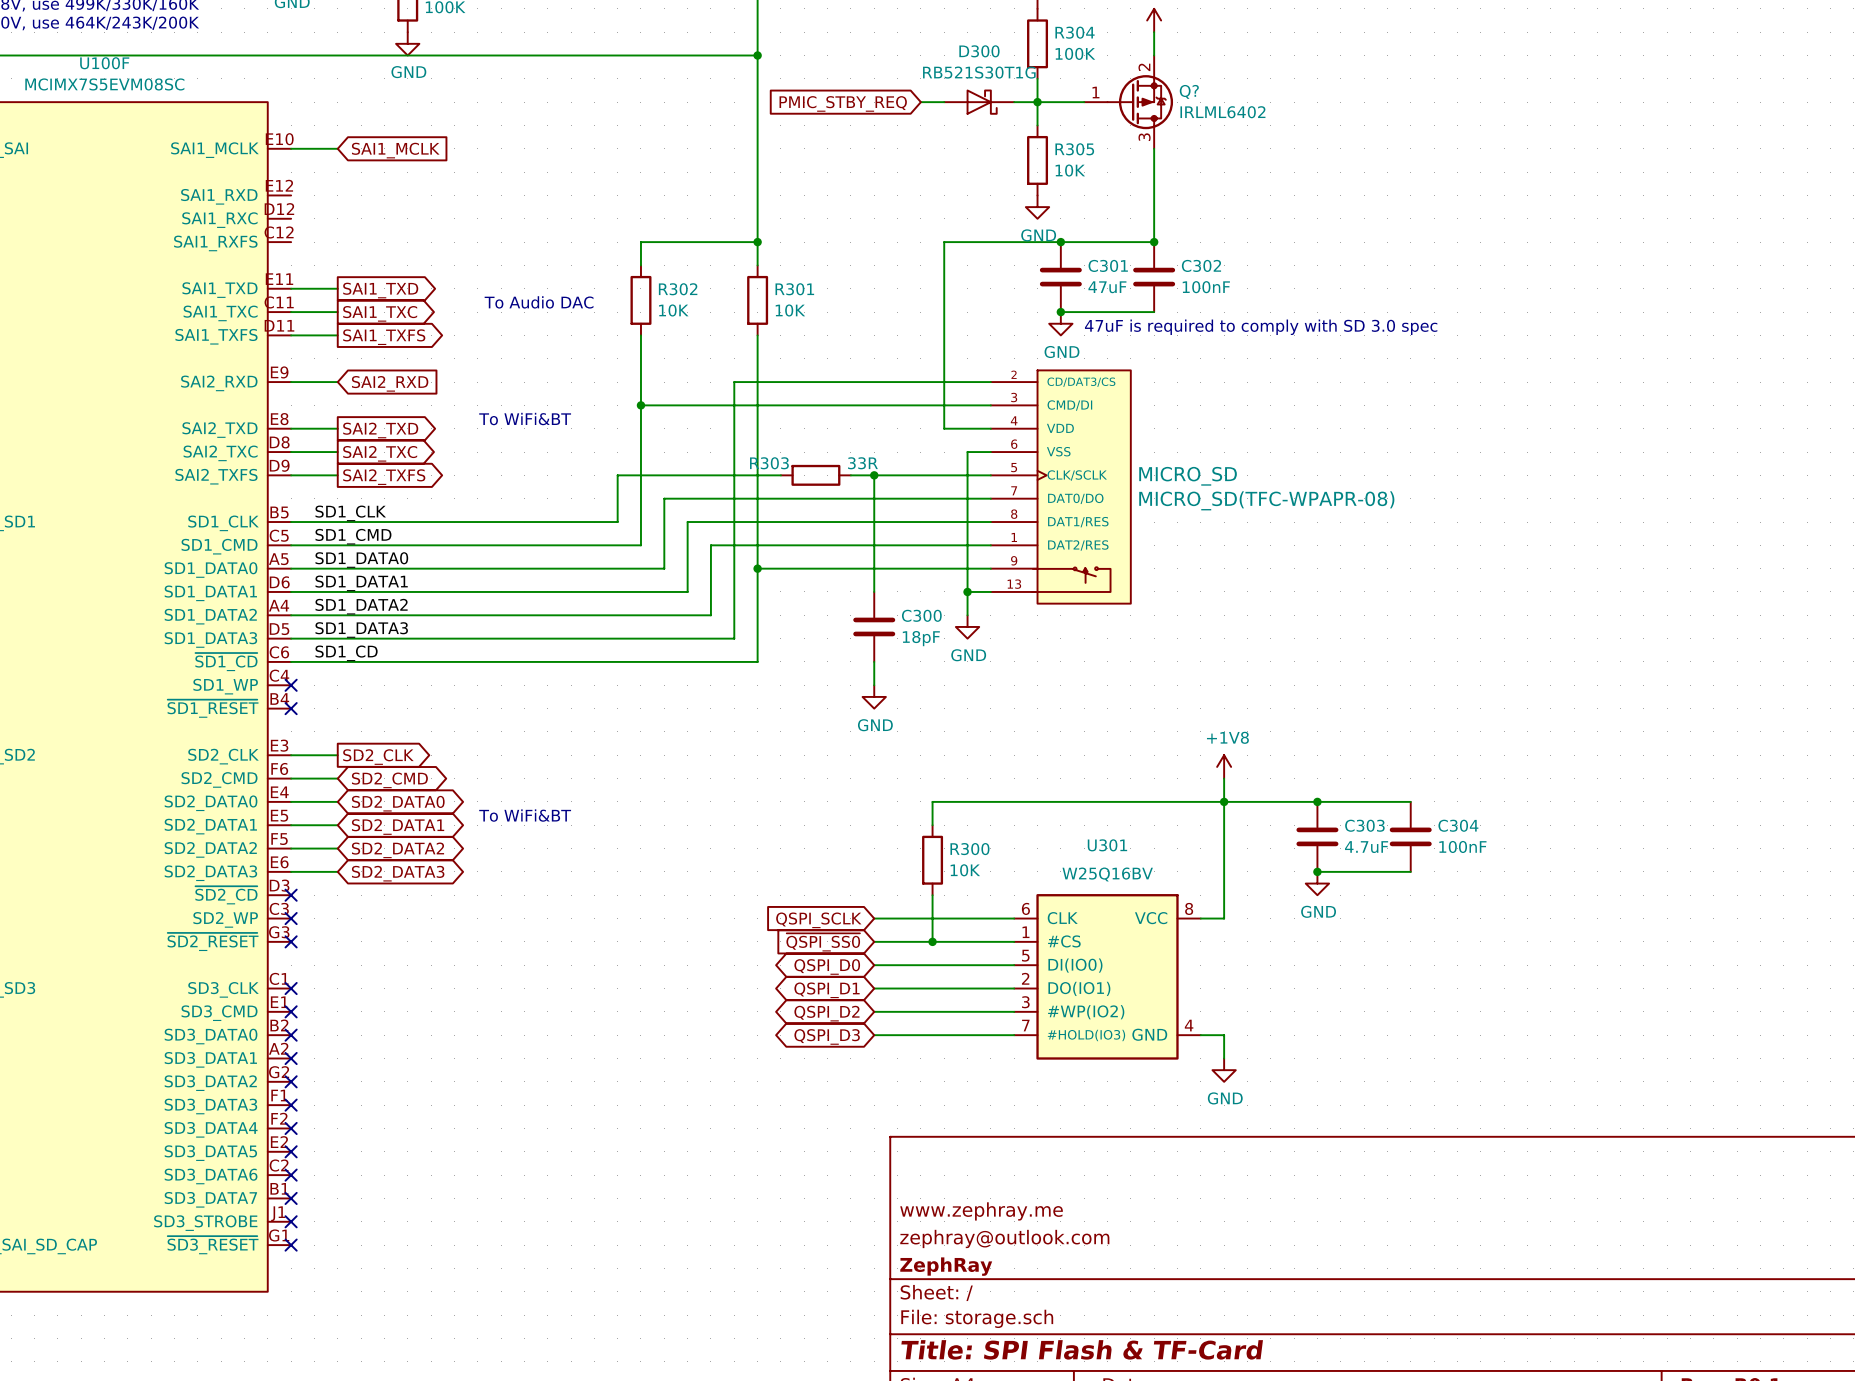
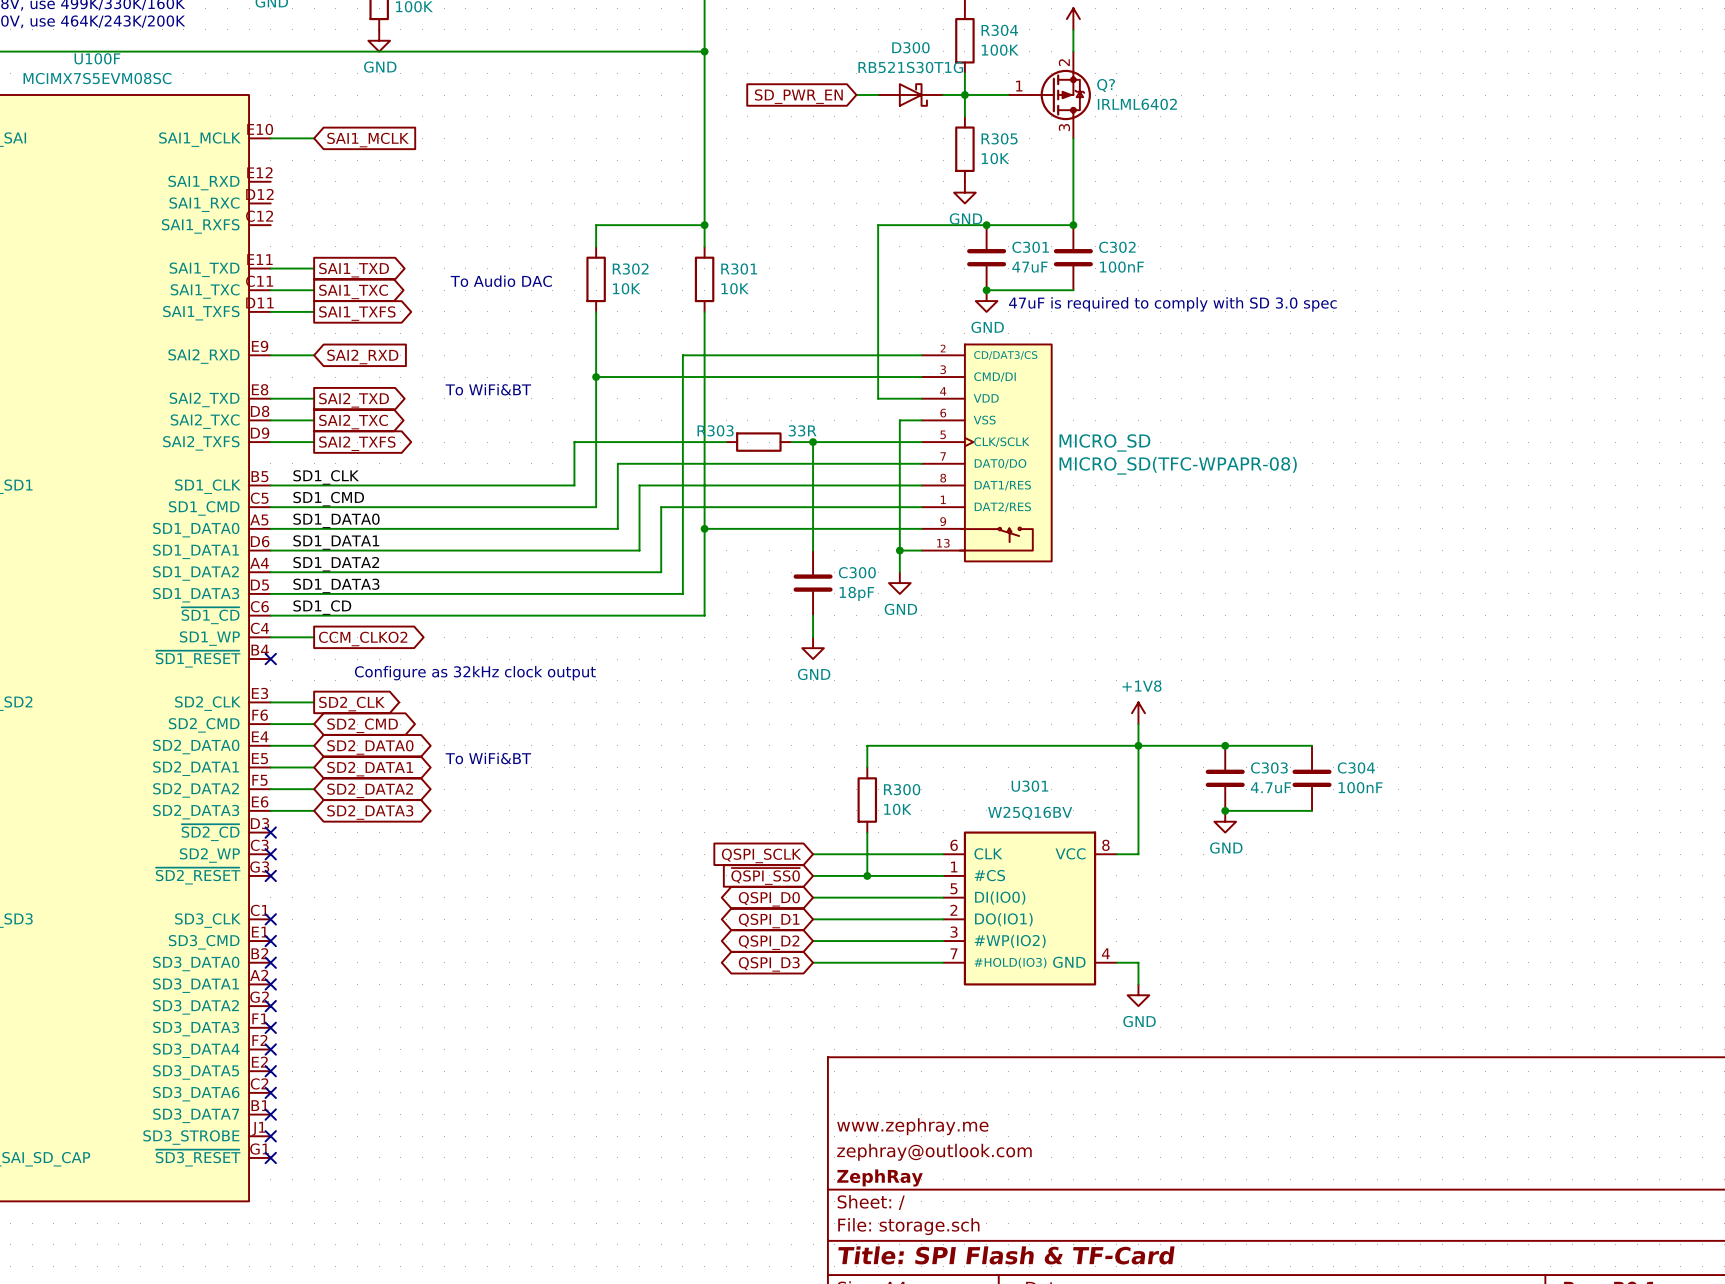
global label: PMIC_STBY_REQ (843, 103) -> SD_PWR_EN (798, 96)
wire: none -> (270, 637) (314, 637)
no-connect mark: (291, 685) -> none
global label: none -> CCM_CLKO2 (363, 638)
text: none -> Configure as 32kHz clock output (475, 673)

